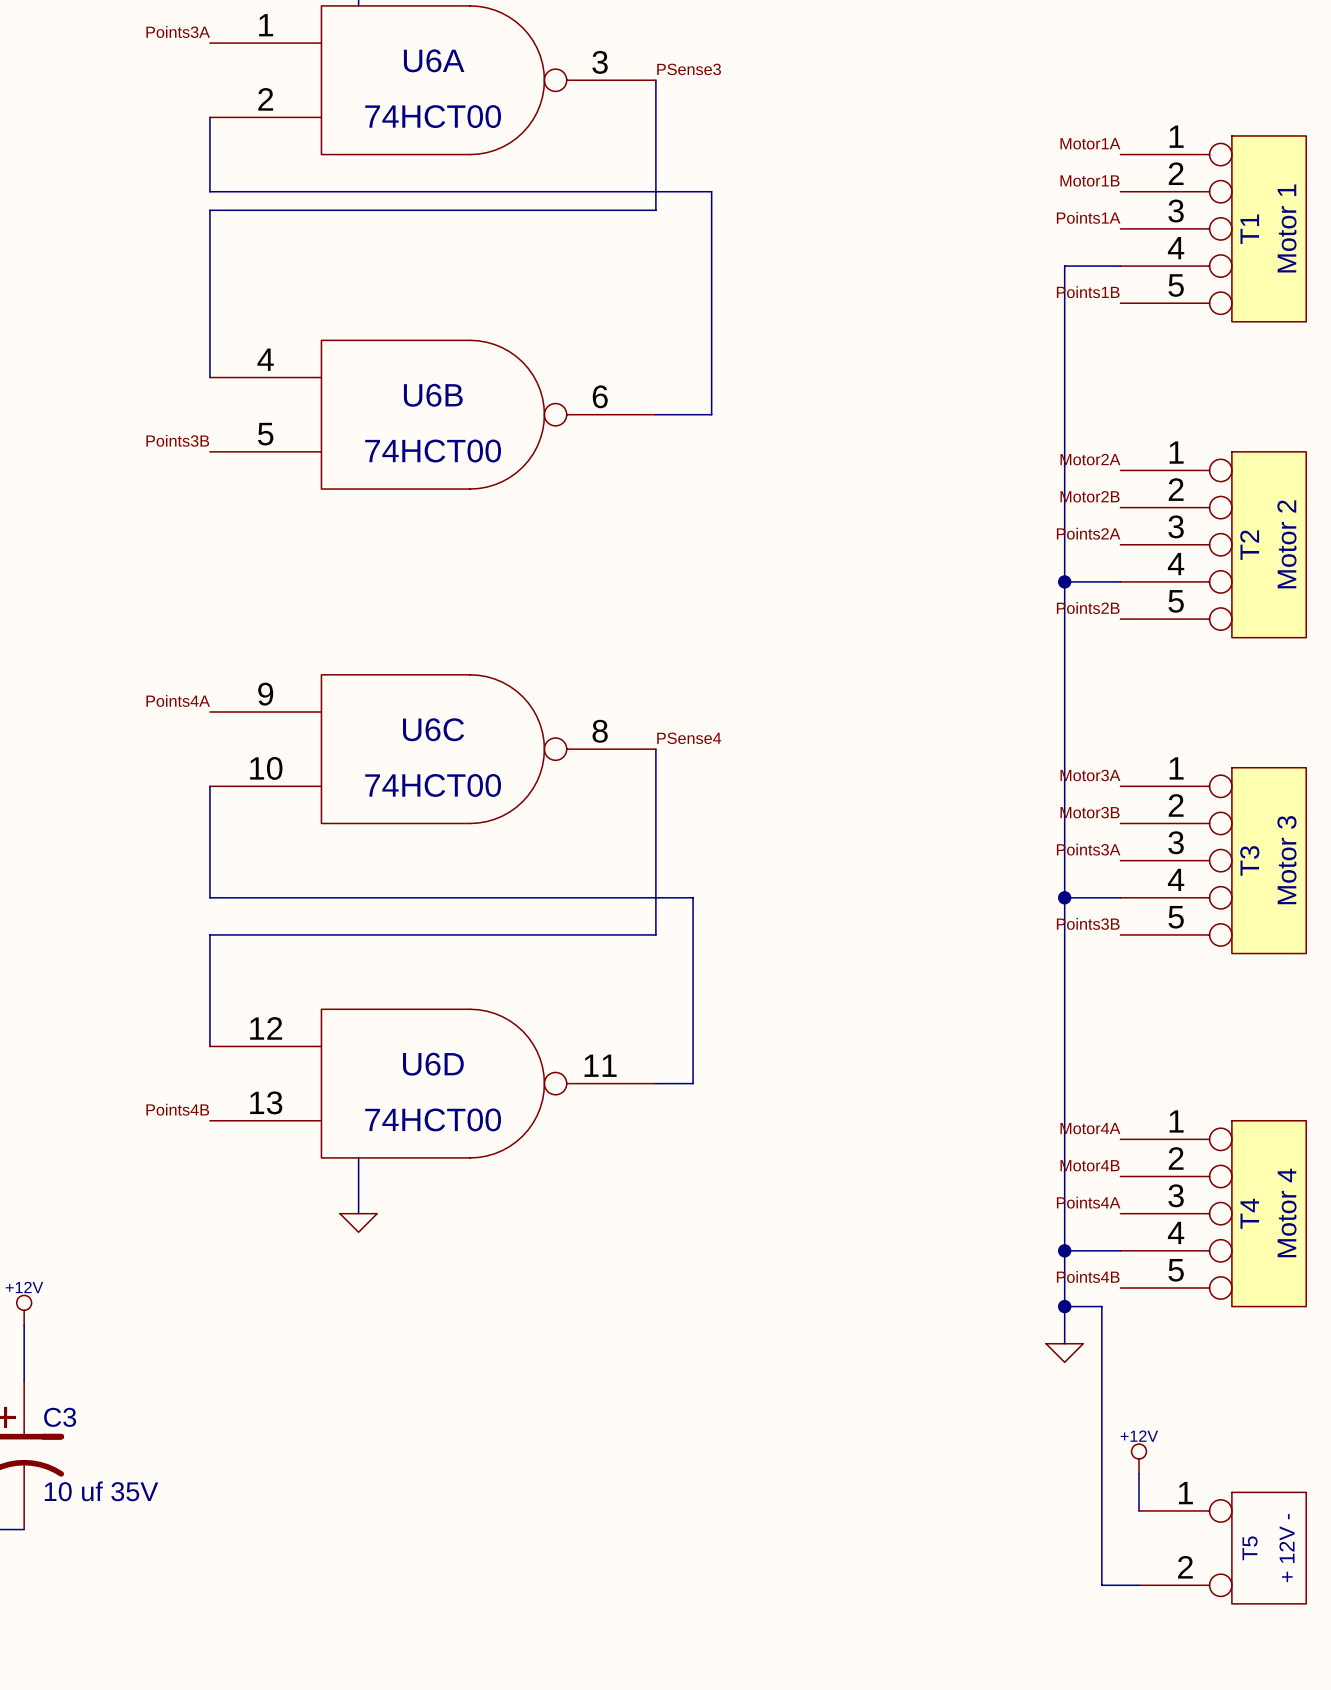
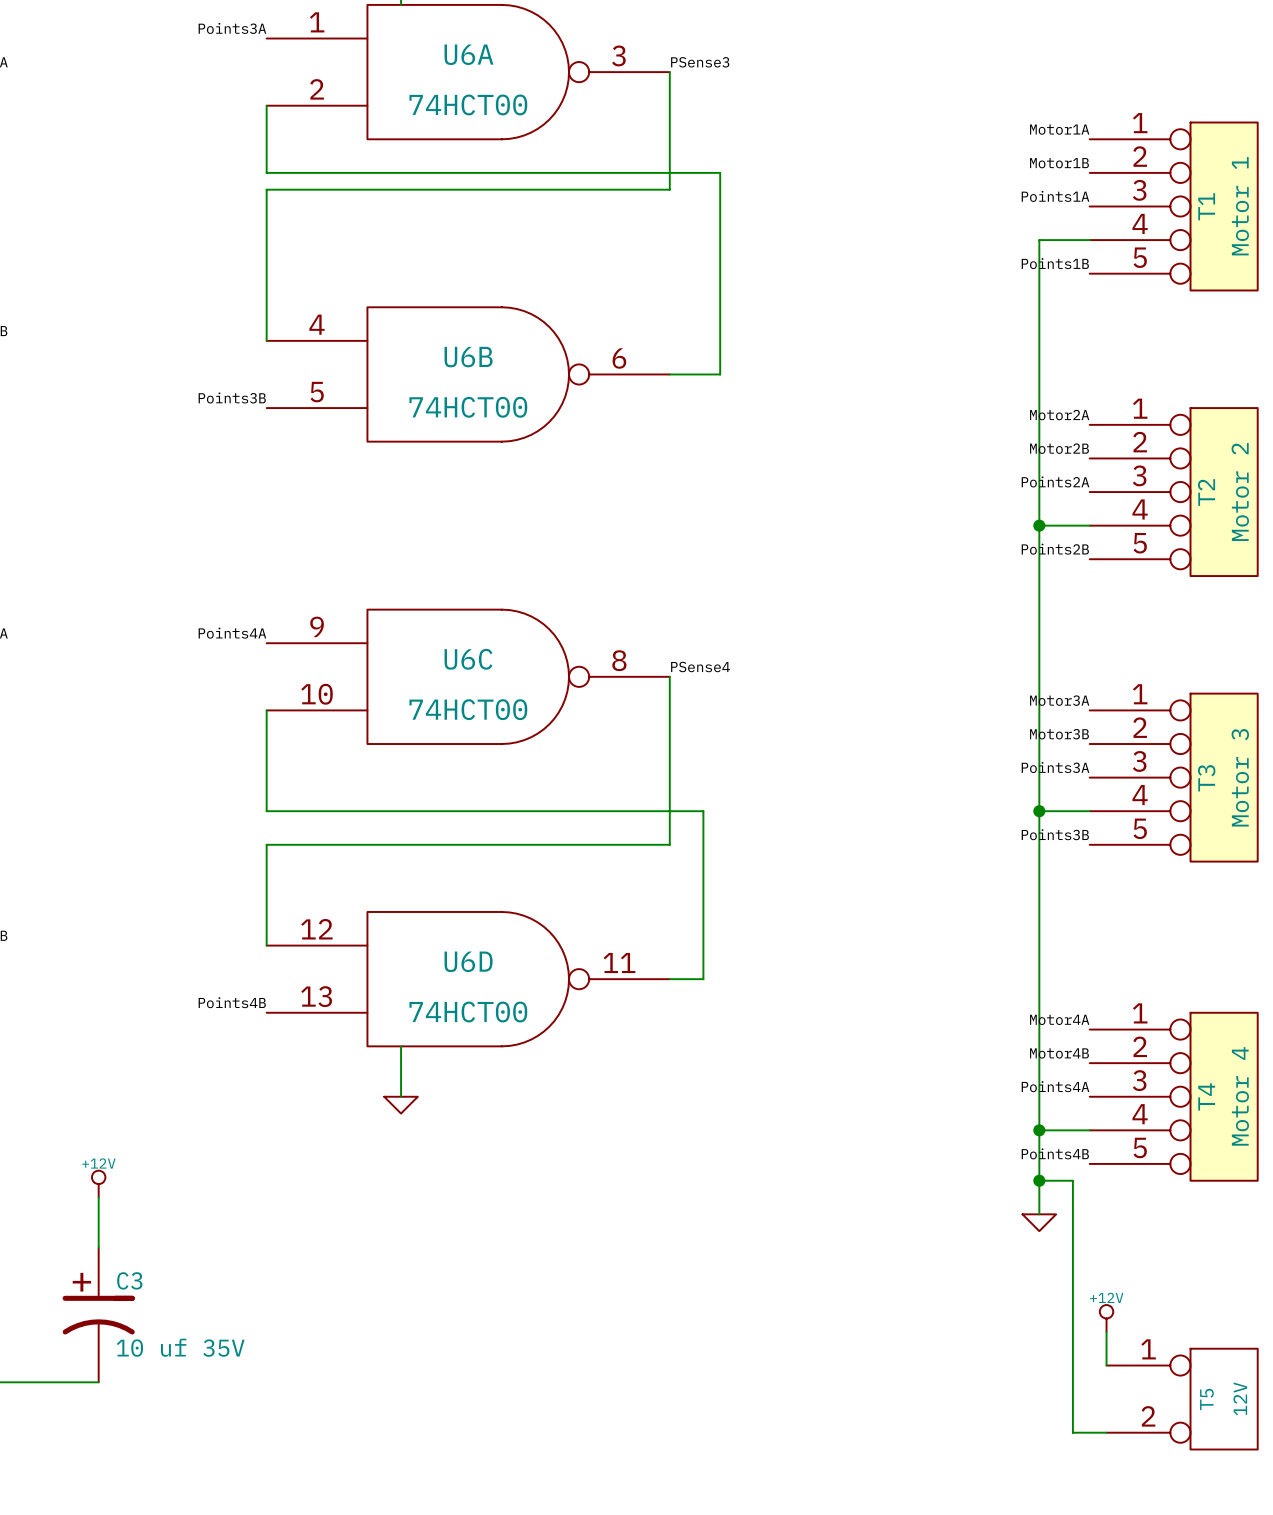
T5 value: + 12V - (1286, 1548) -> 12V (1240, 1398)

